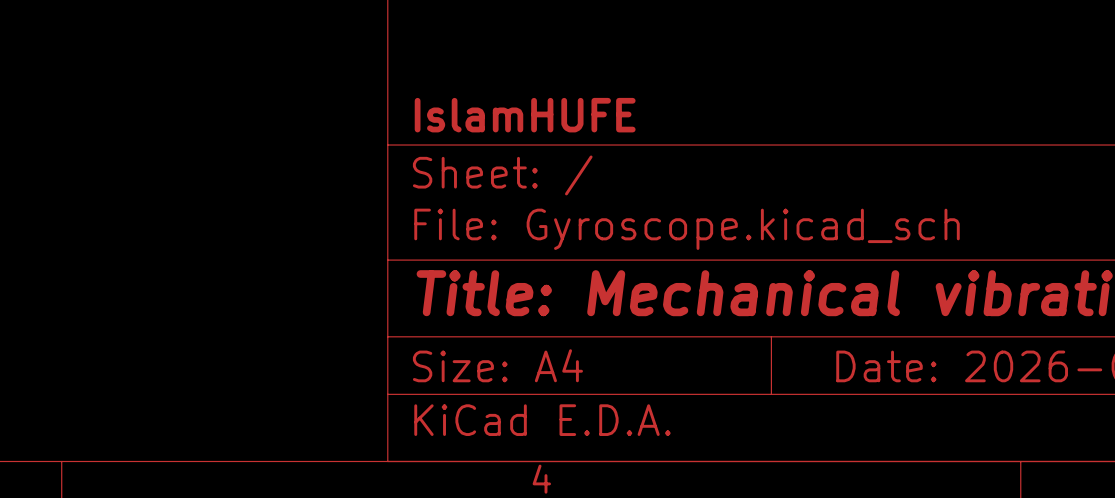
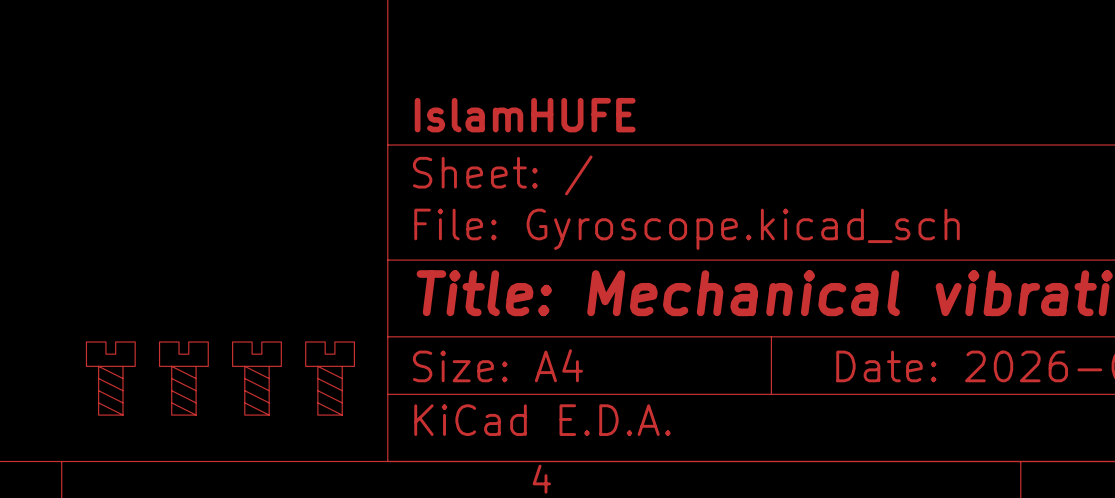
part: none -> (110, 378)
part: none -> (183, 378)
part: none -> (256, 378)
part: none -> (330, 378)

